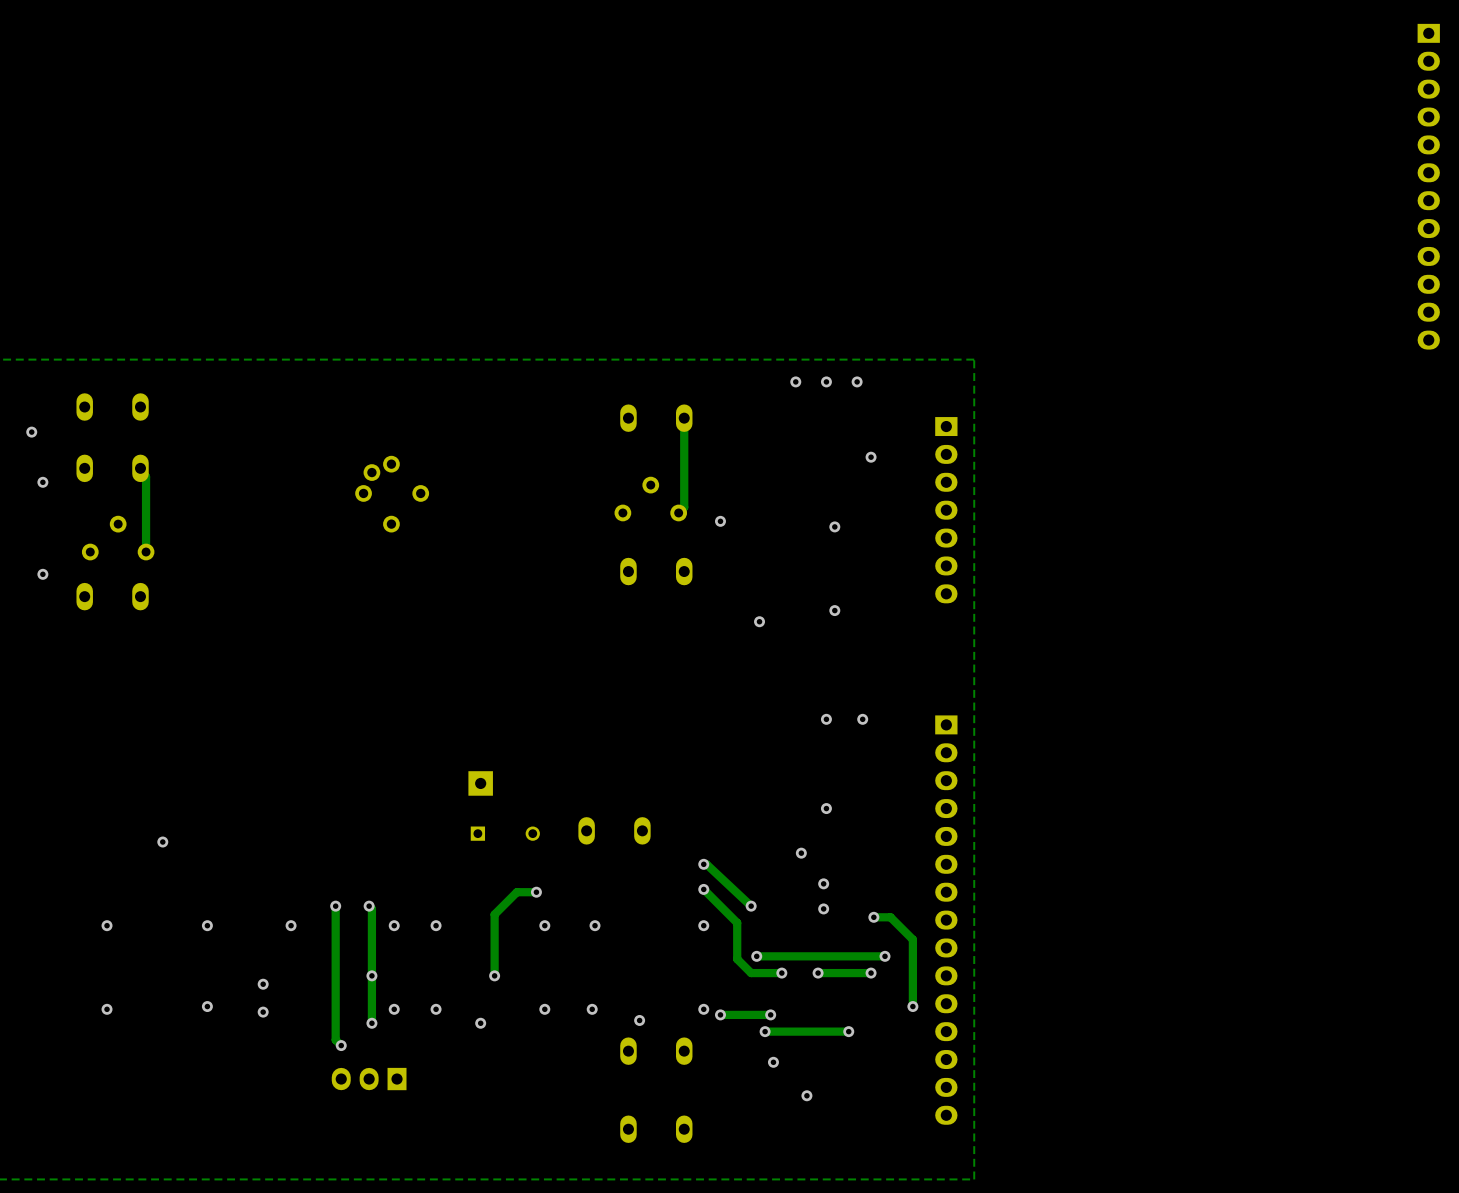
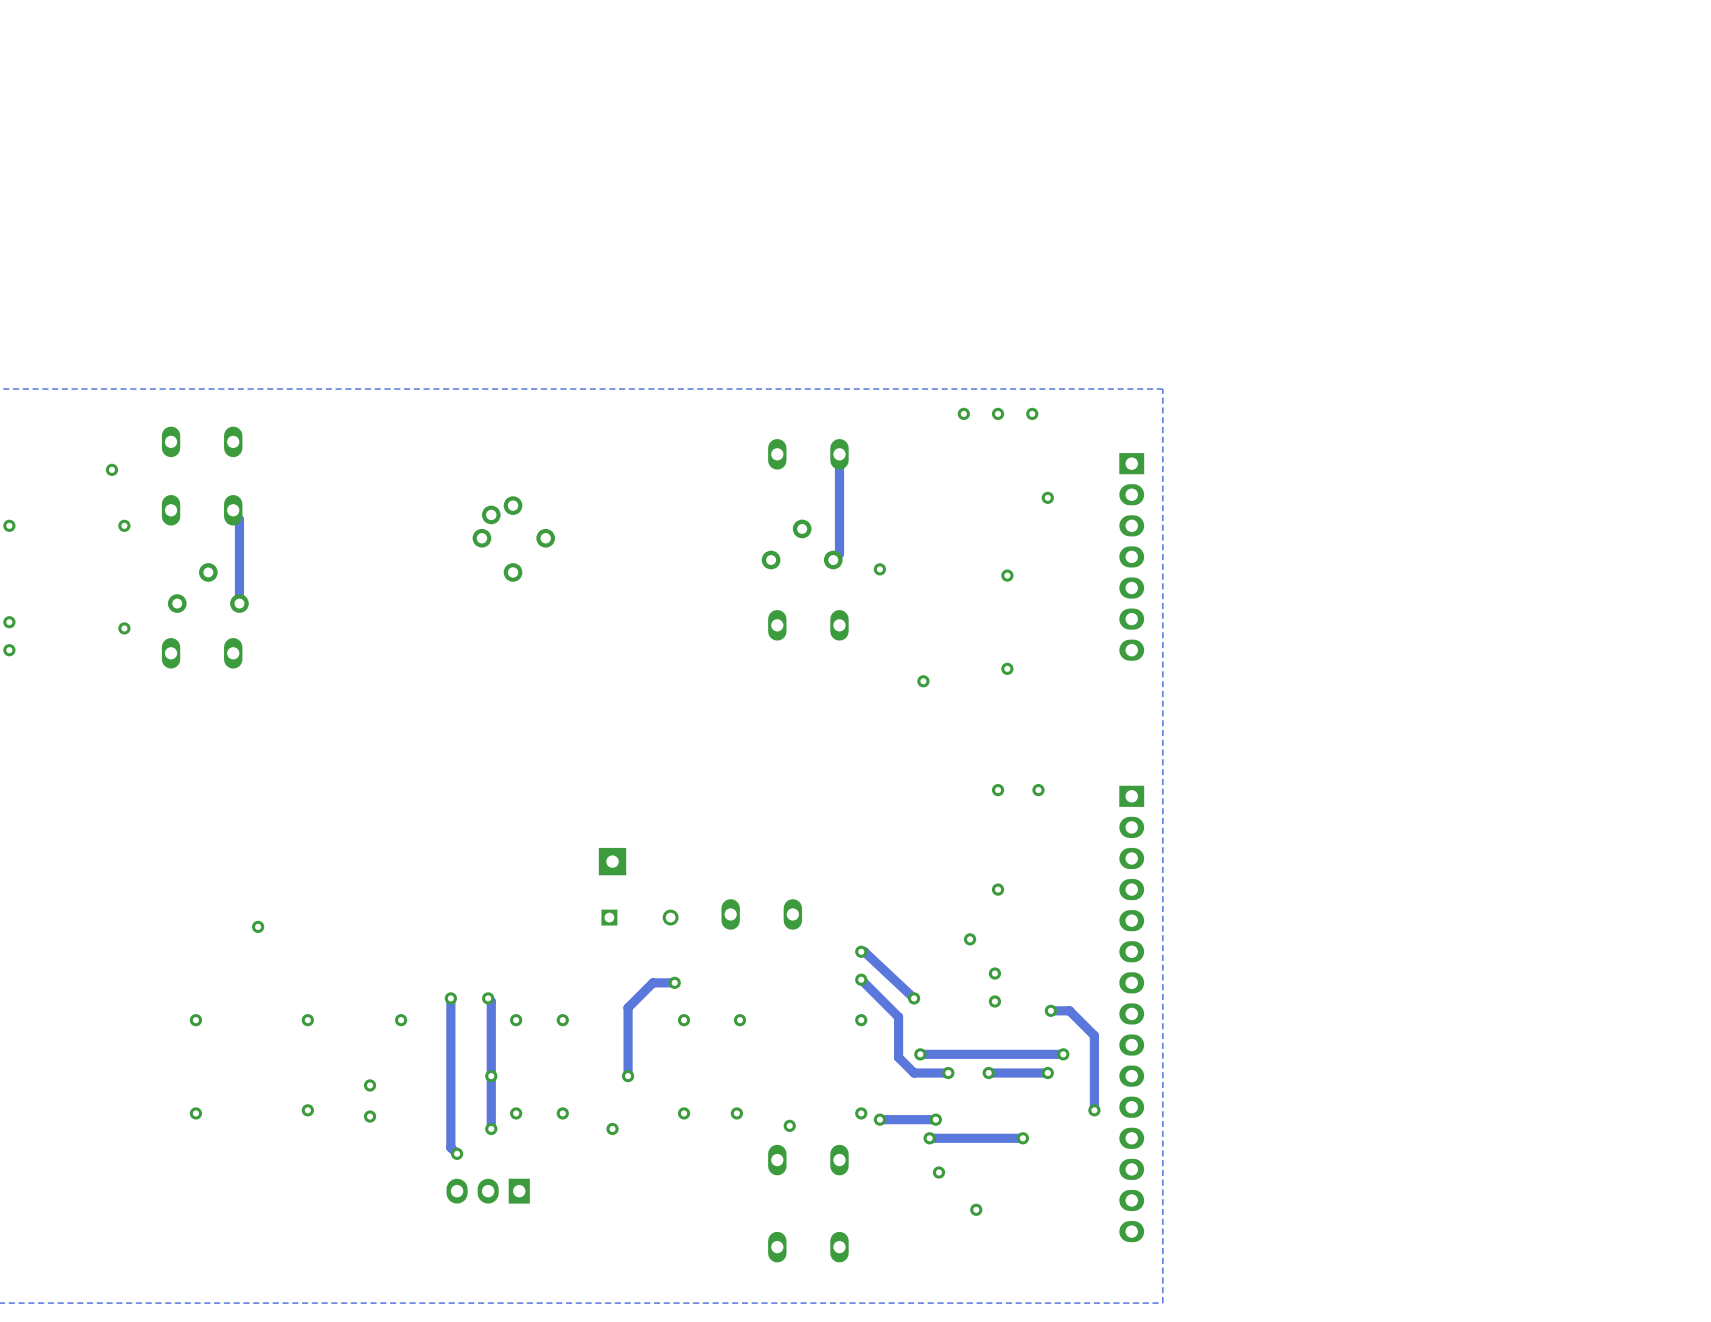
part: (1428, 186) -> none

